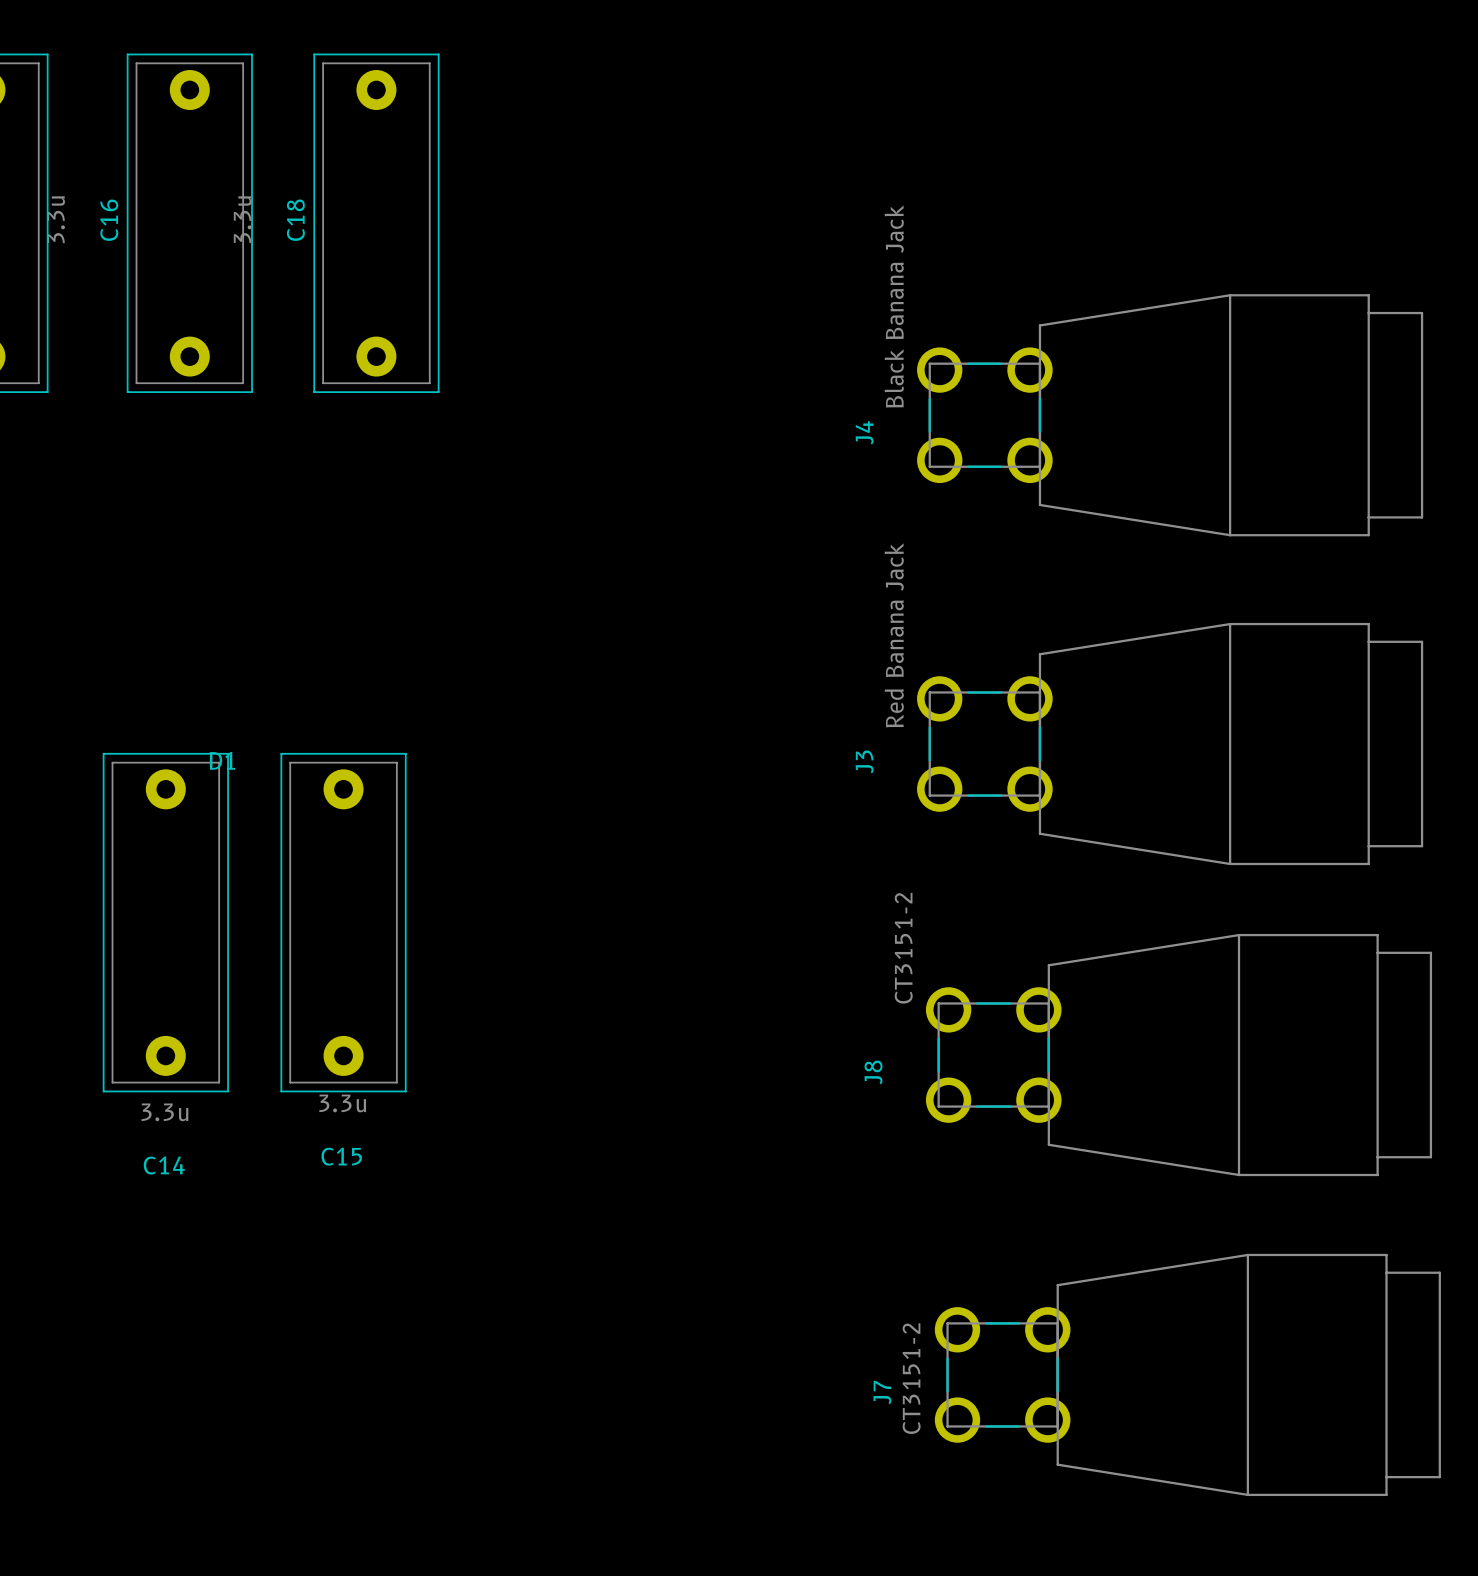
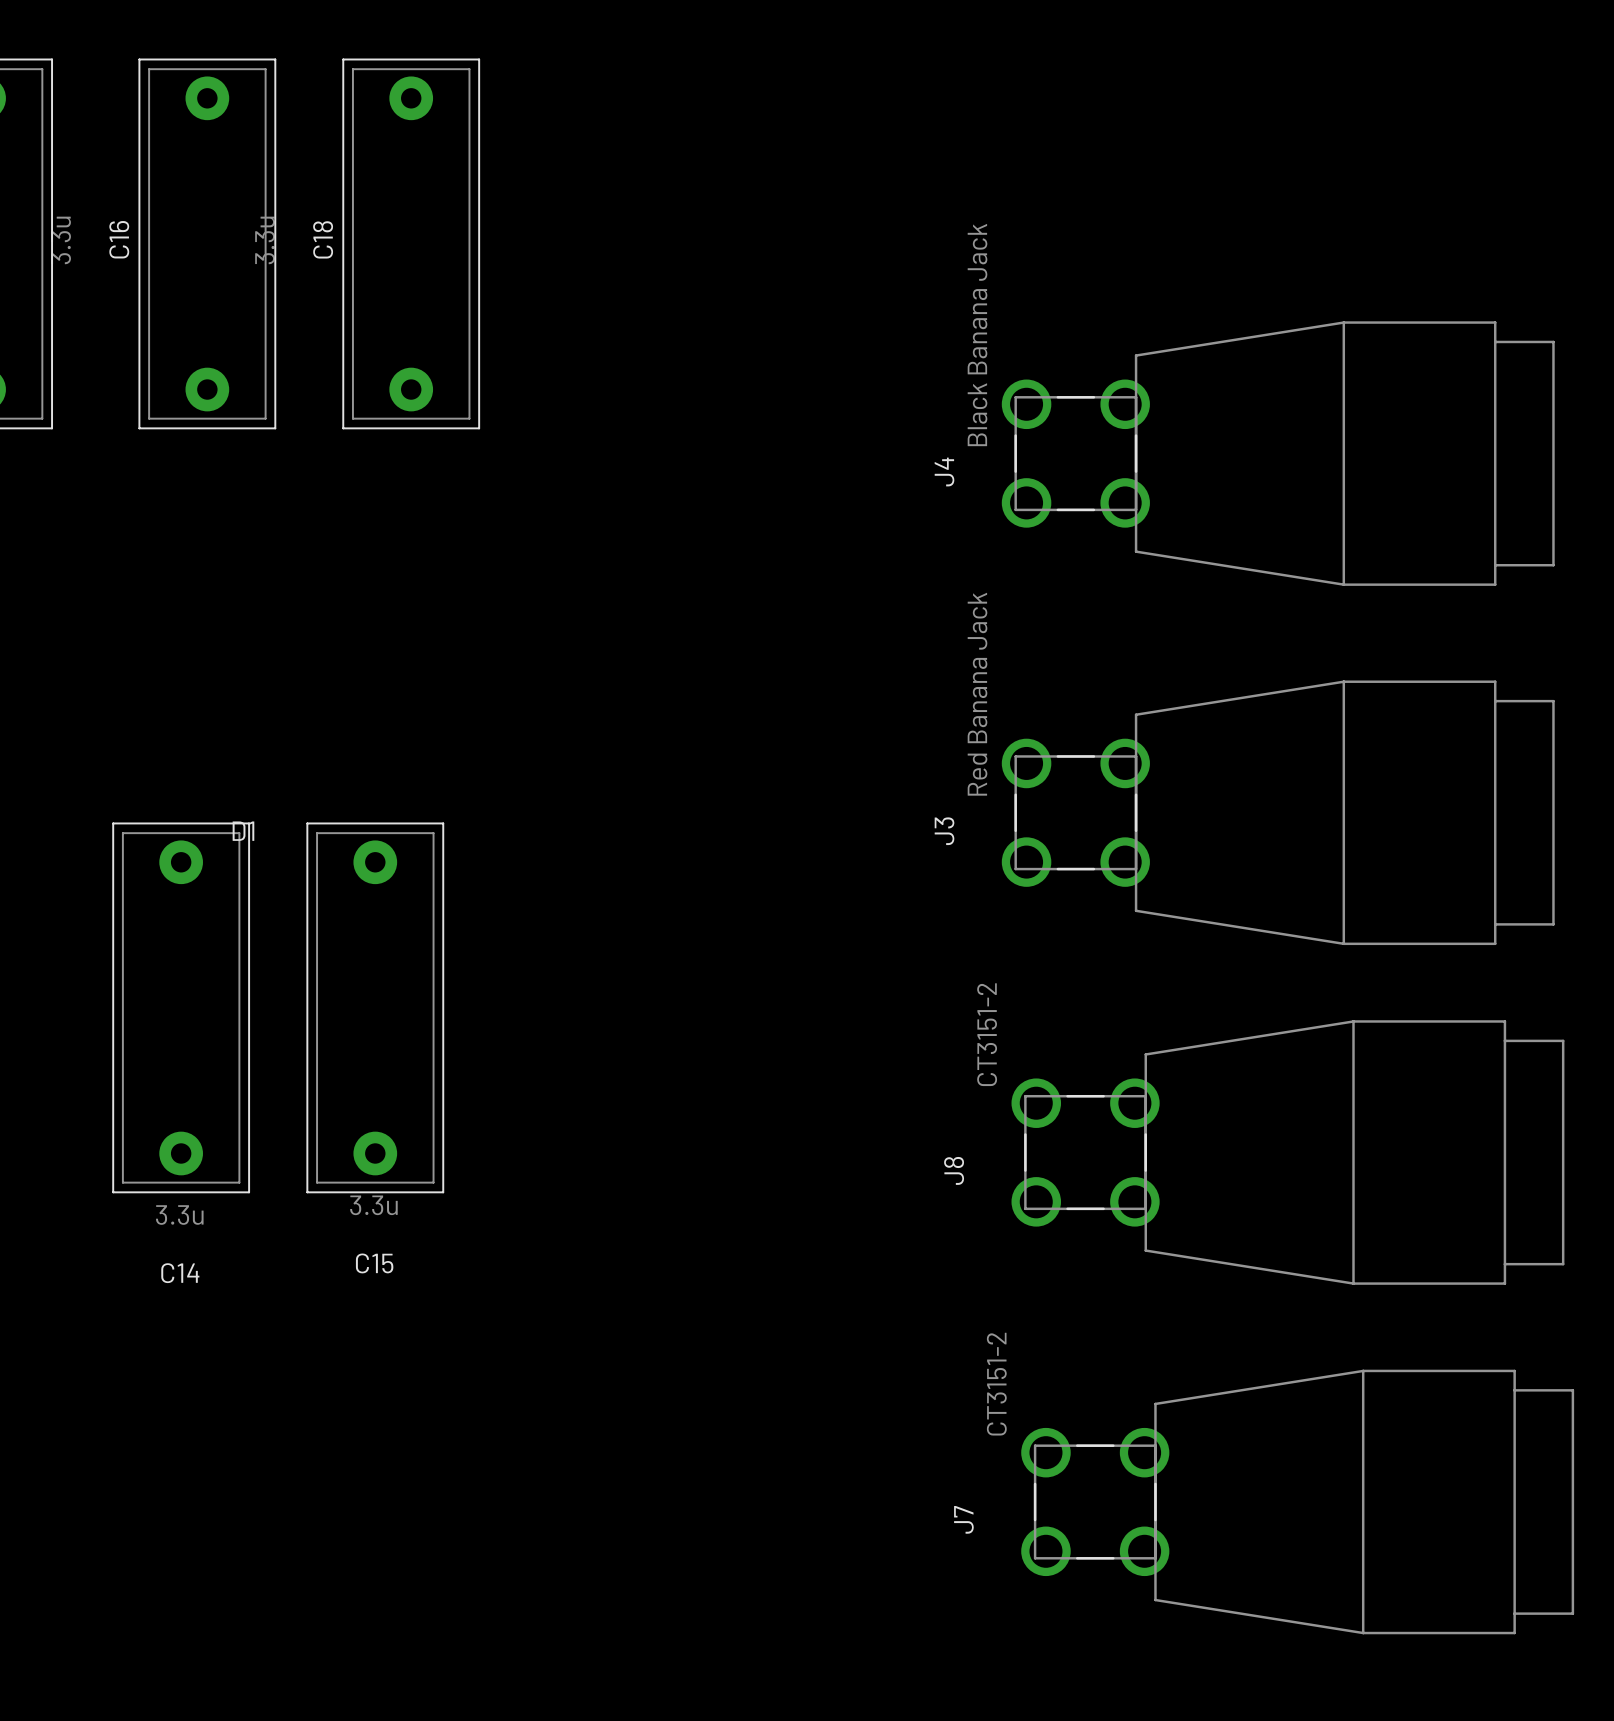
J7 value position: CT3151-2 (911, 1378) -> CT3151-2 (996, 1384)

